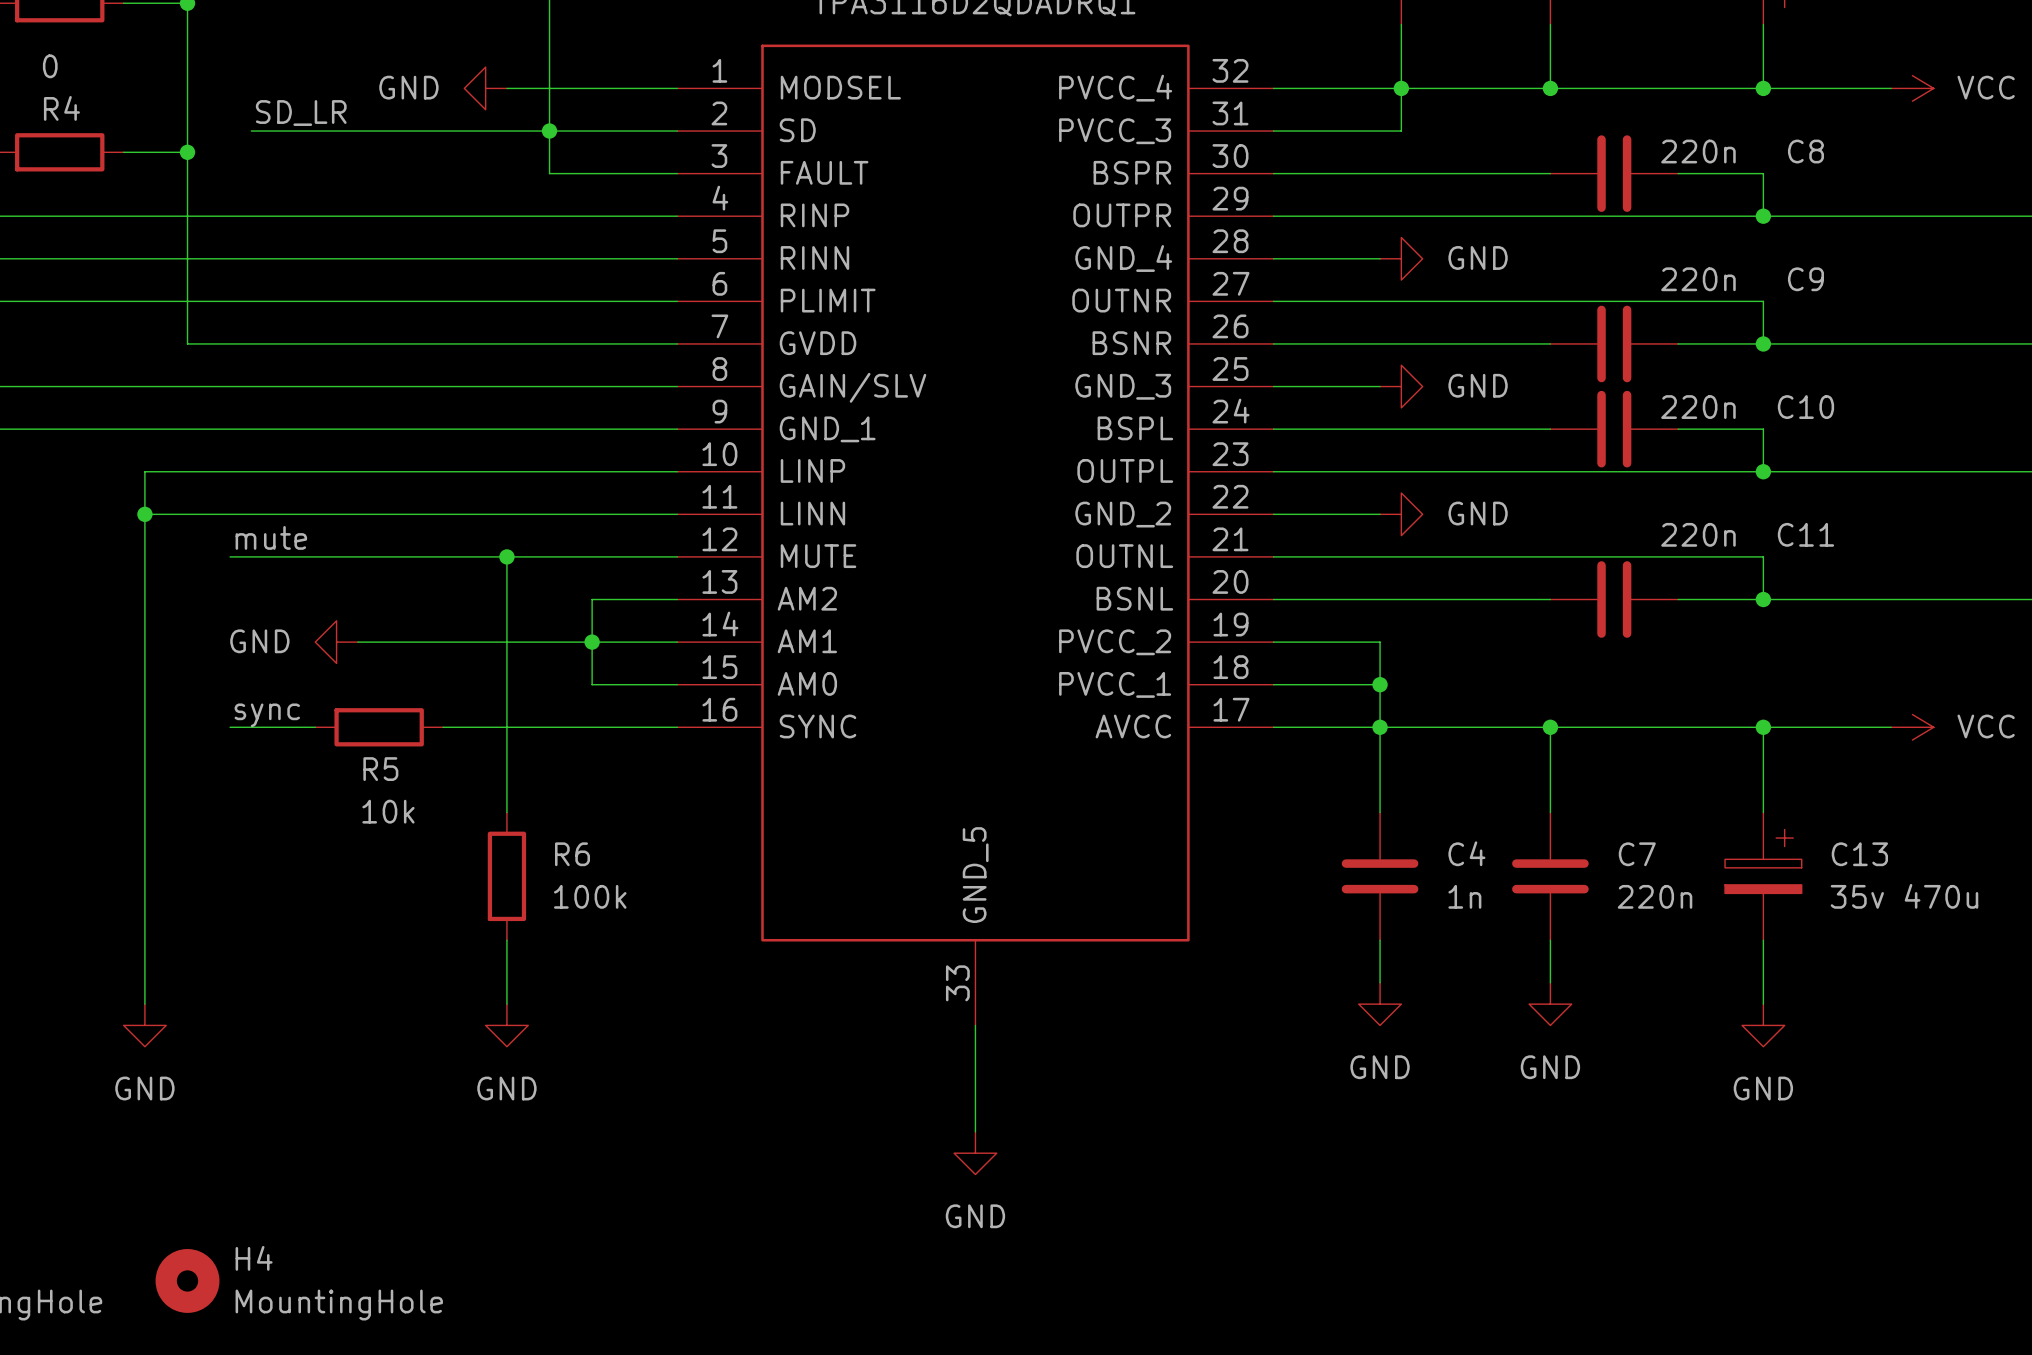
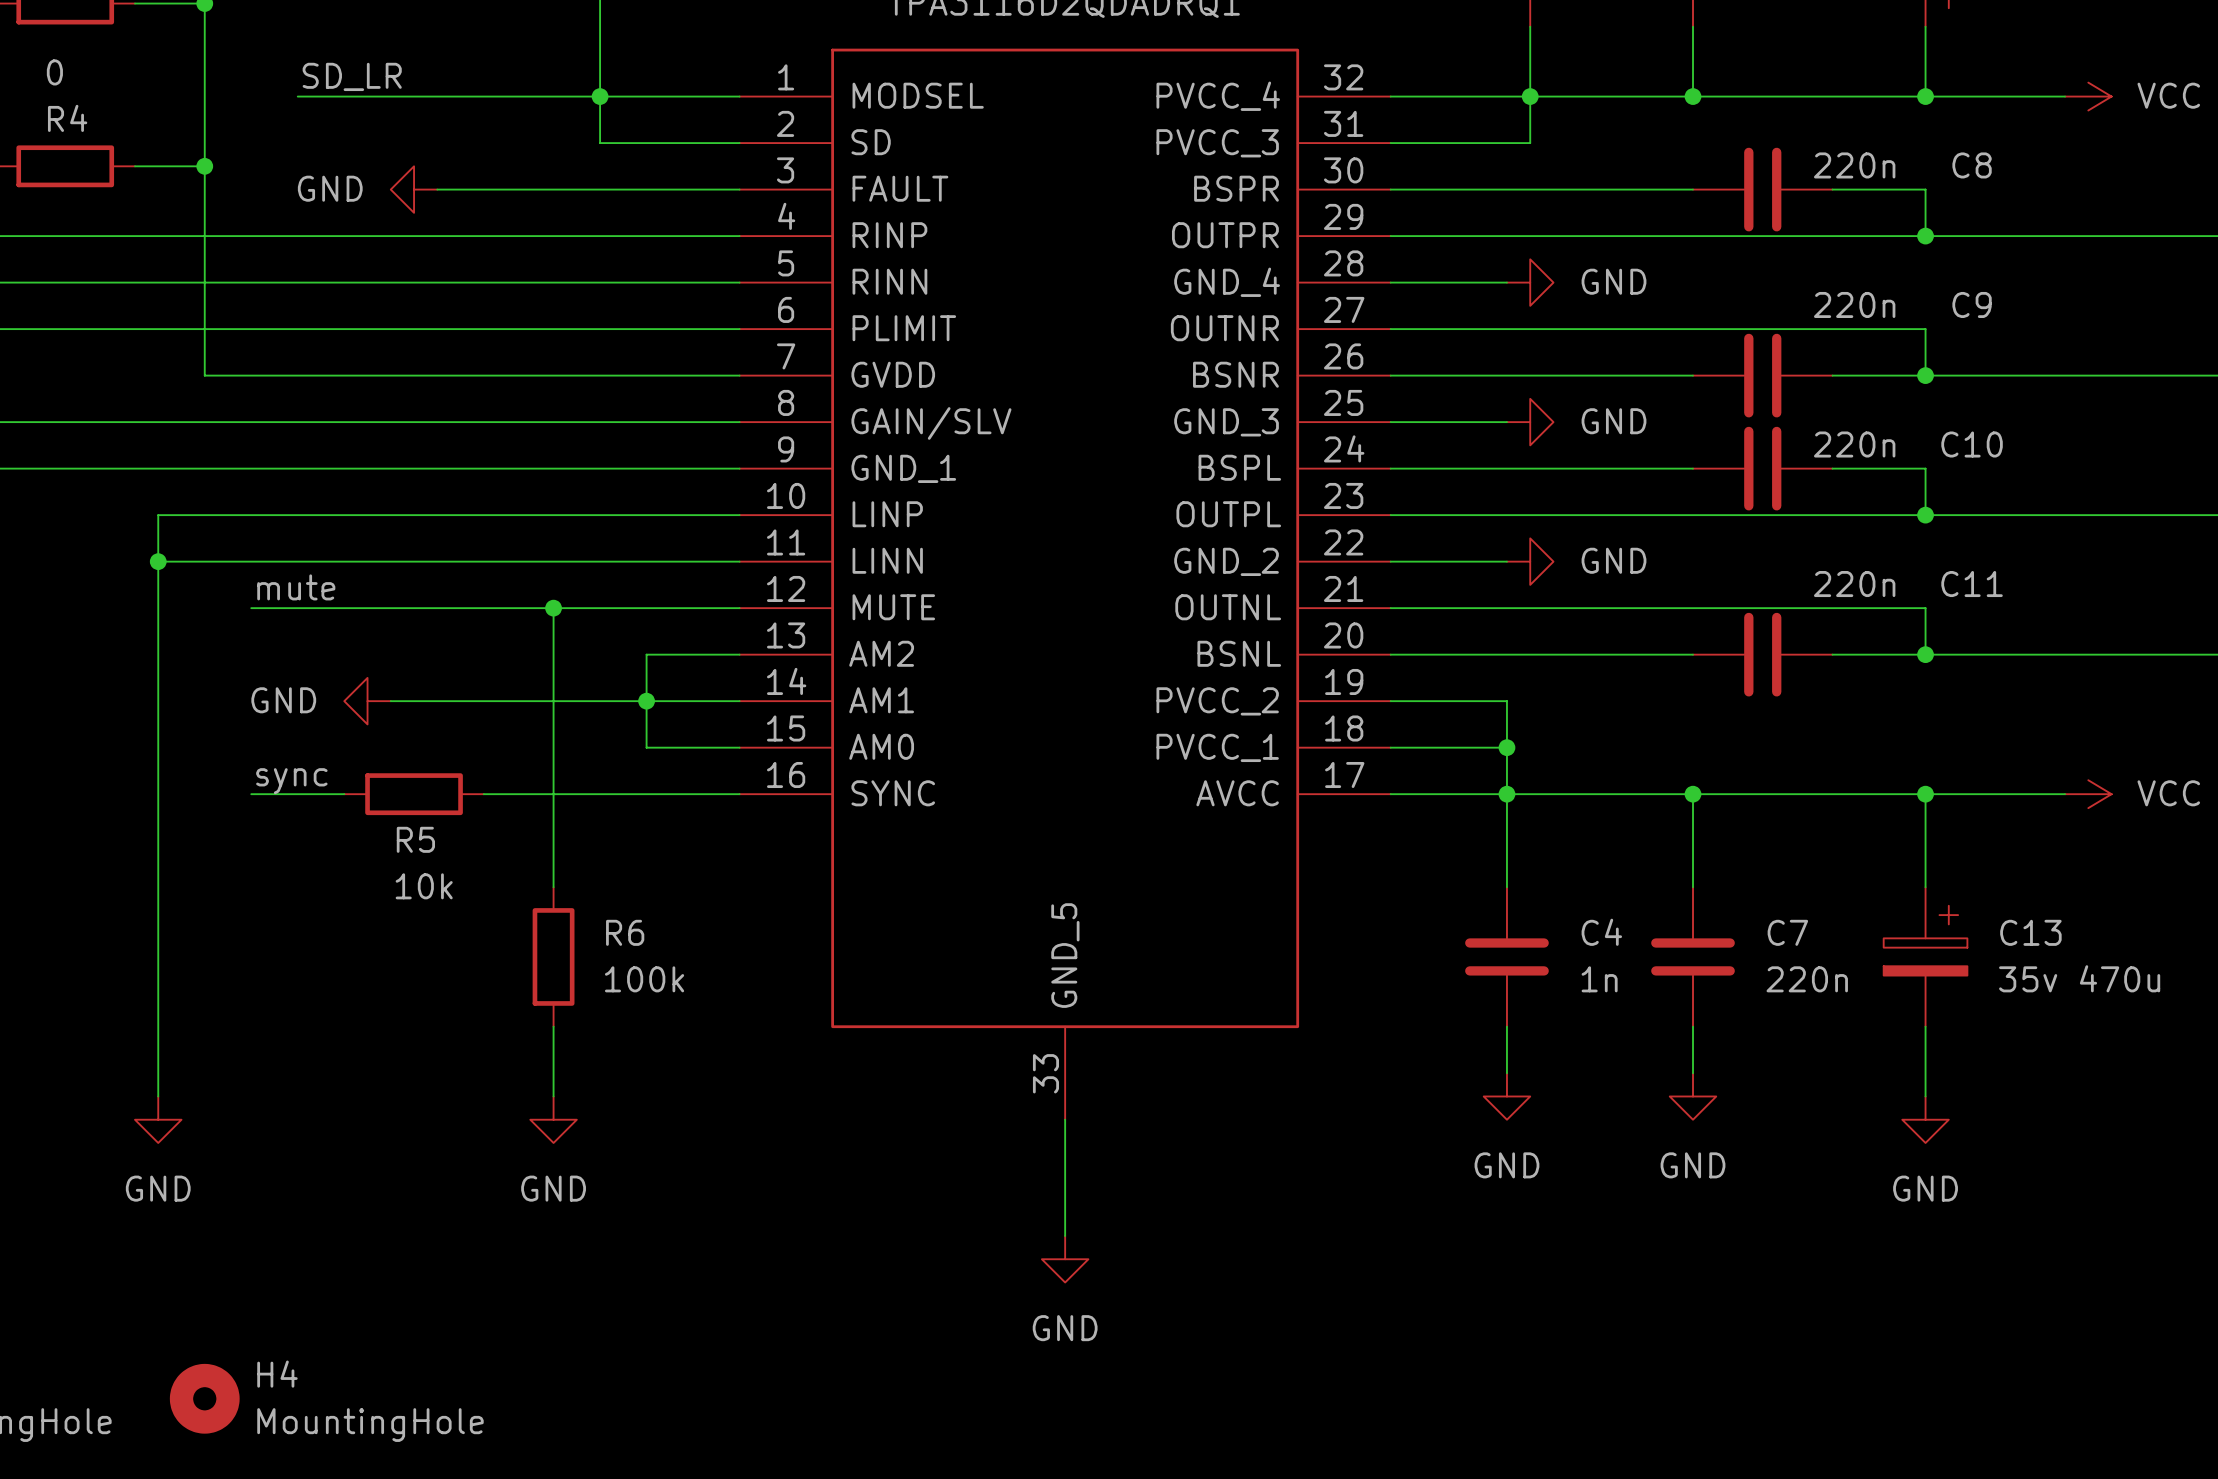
wire: none -> (297, 96) (553, 96)
power symbol position: GND (485, 88) -> GND (414, 189)
label position: SD_LR (301, 113) -> SD_LR (352, 76)
wire: (251, 131) (549, 131) (549, 173) -> (437, 189) (600, 189)
junction position: (549, 131) -> (600, 96)

